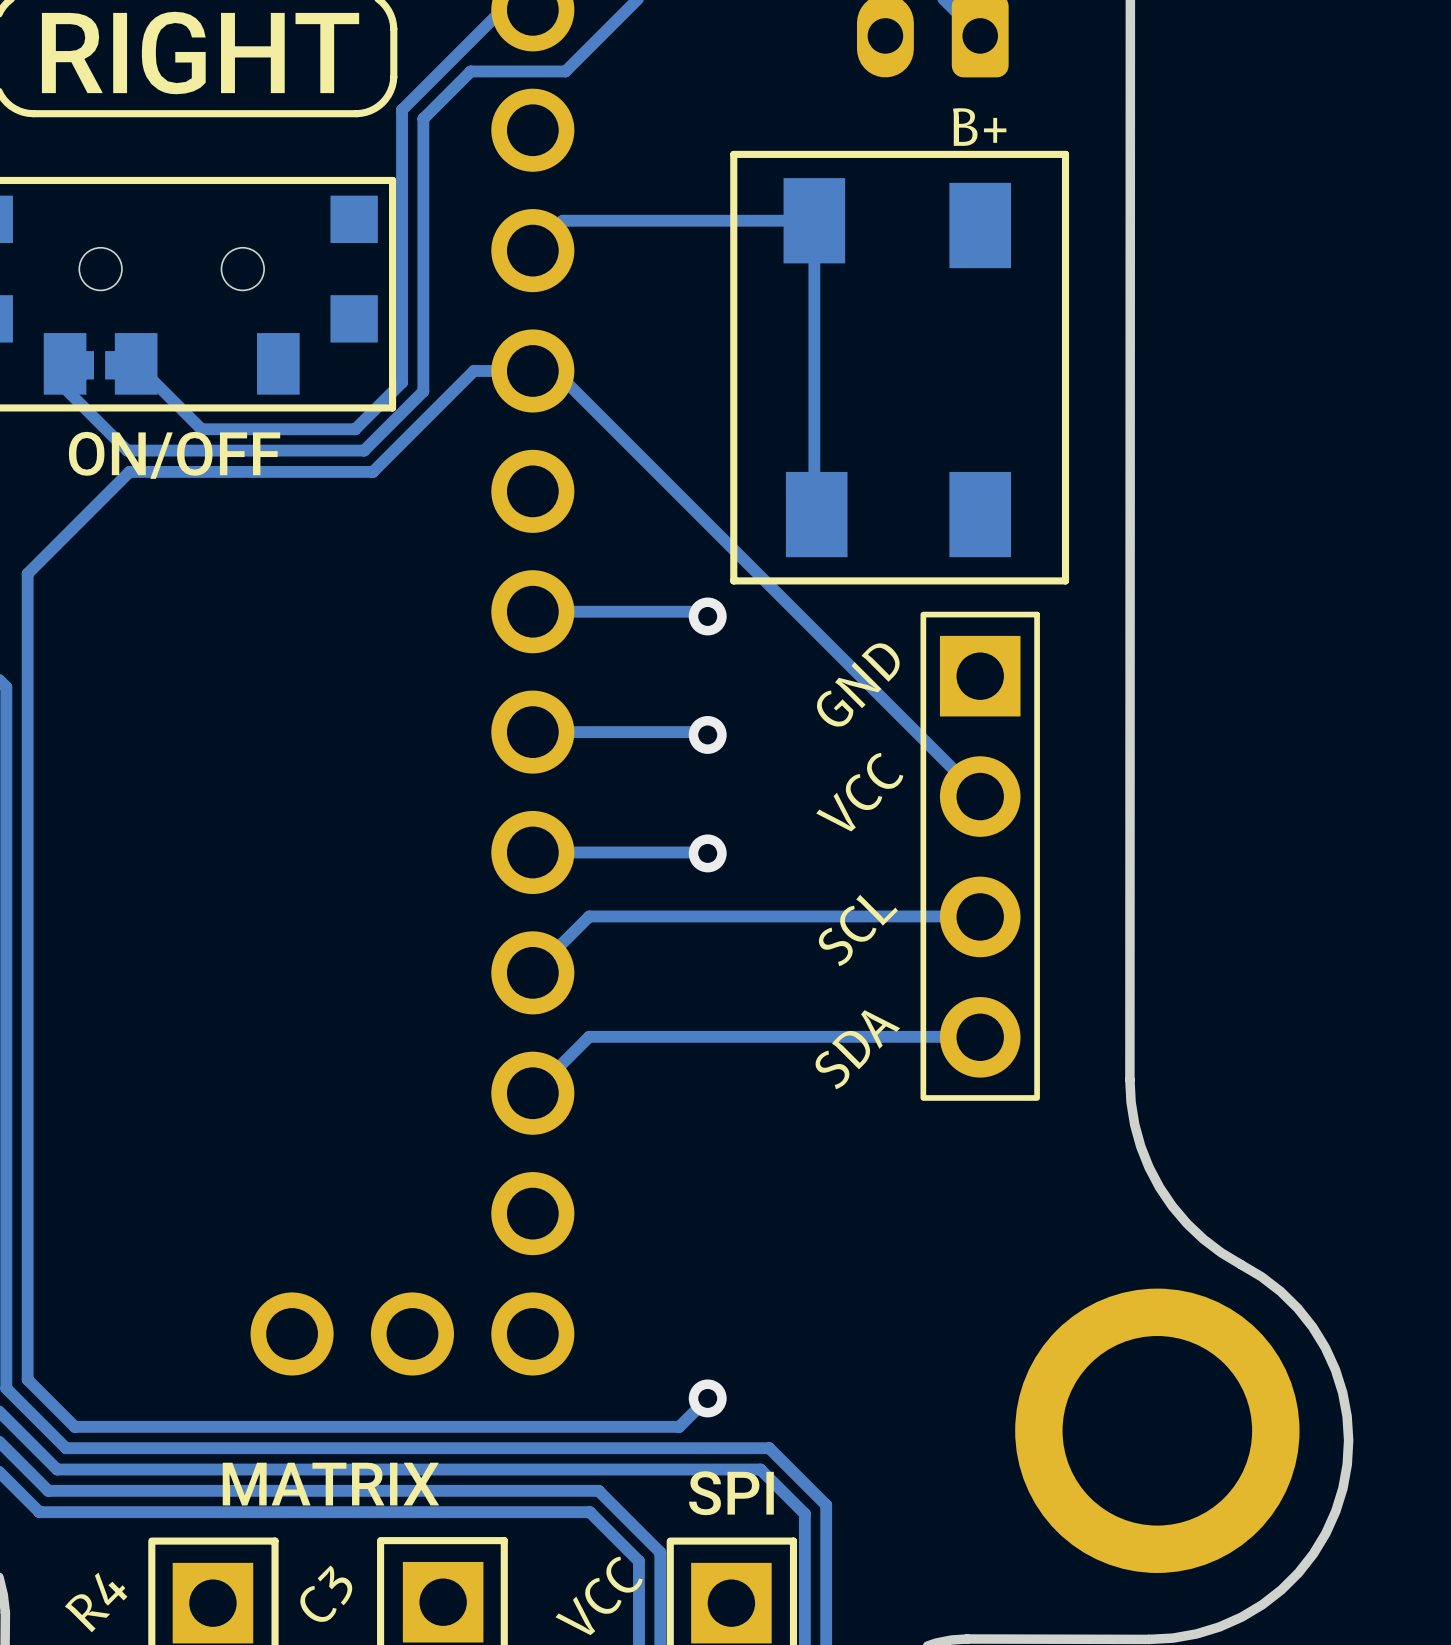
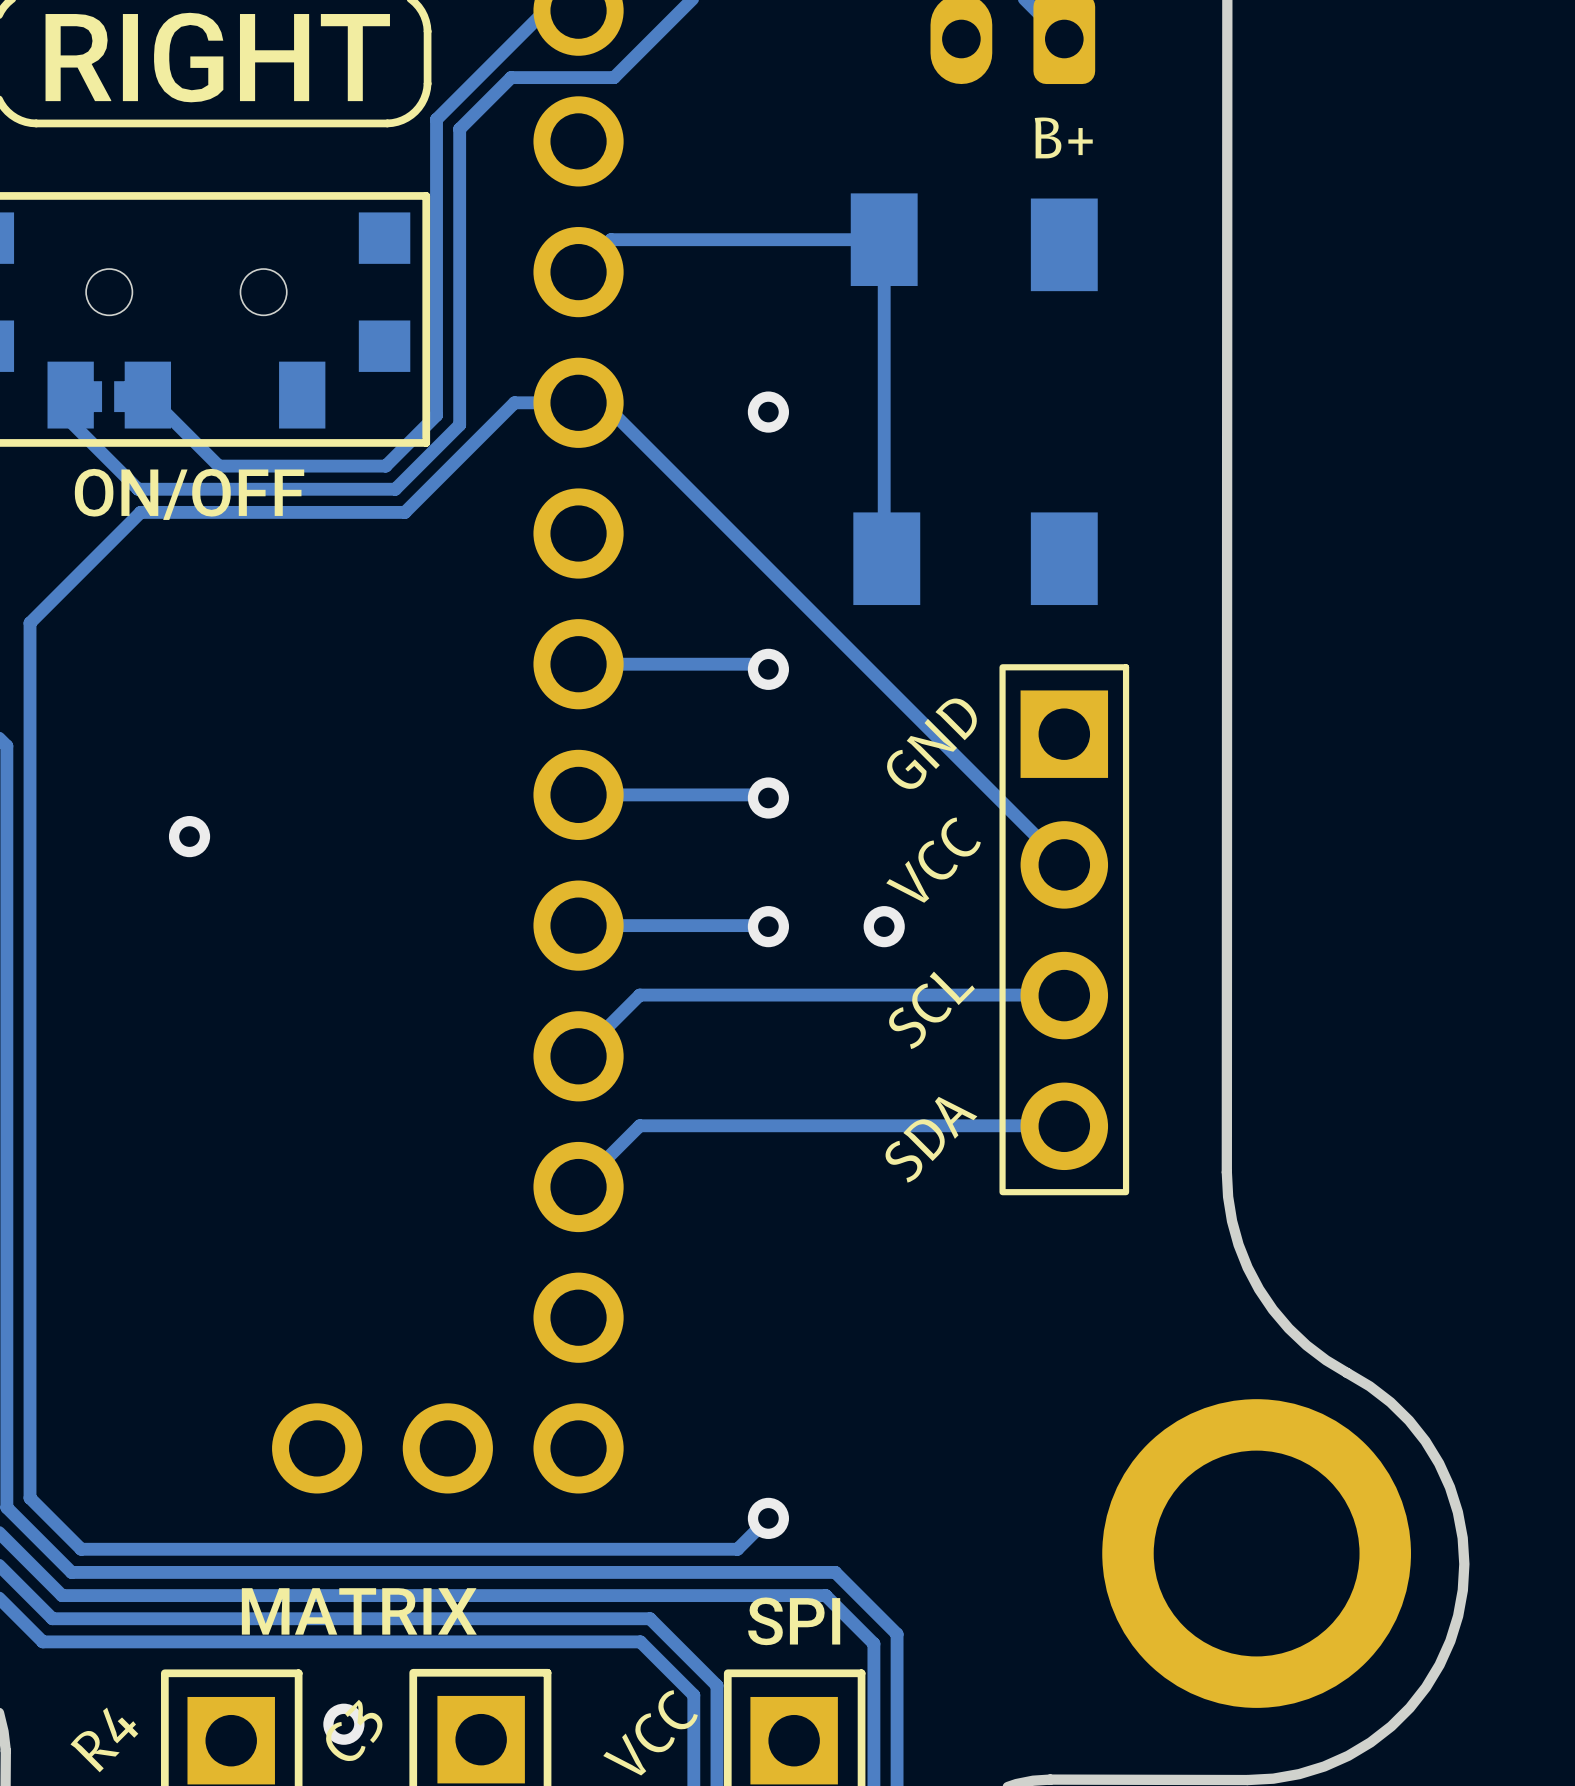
line: (1065, 154) (733, 154) (733, 580) (1065, 580) (1065, 154) -> none
via: none -> (768, 412)
via: none -> (189, 836)
via: none -> (884, 926)
via: none -> (343, 1724)

